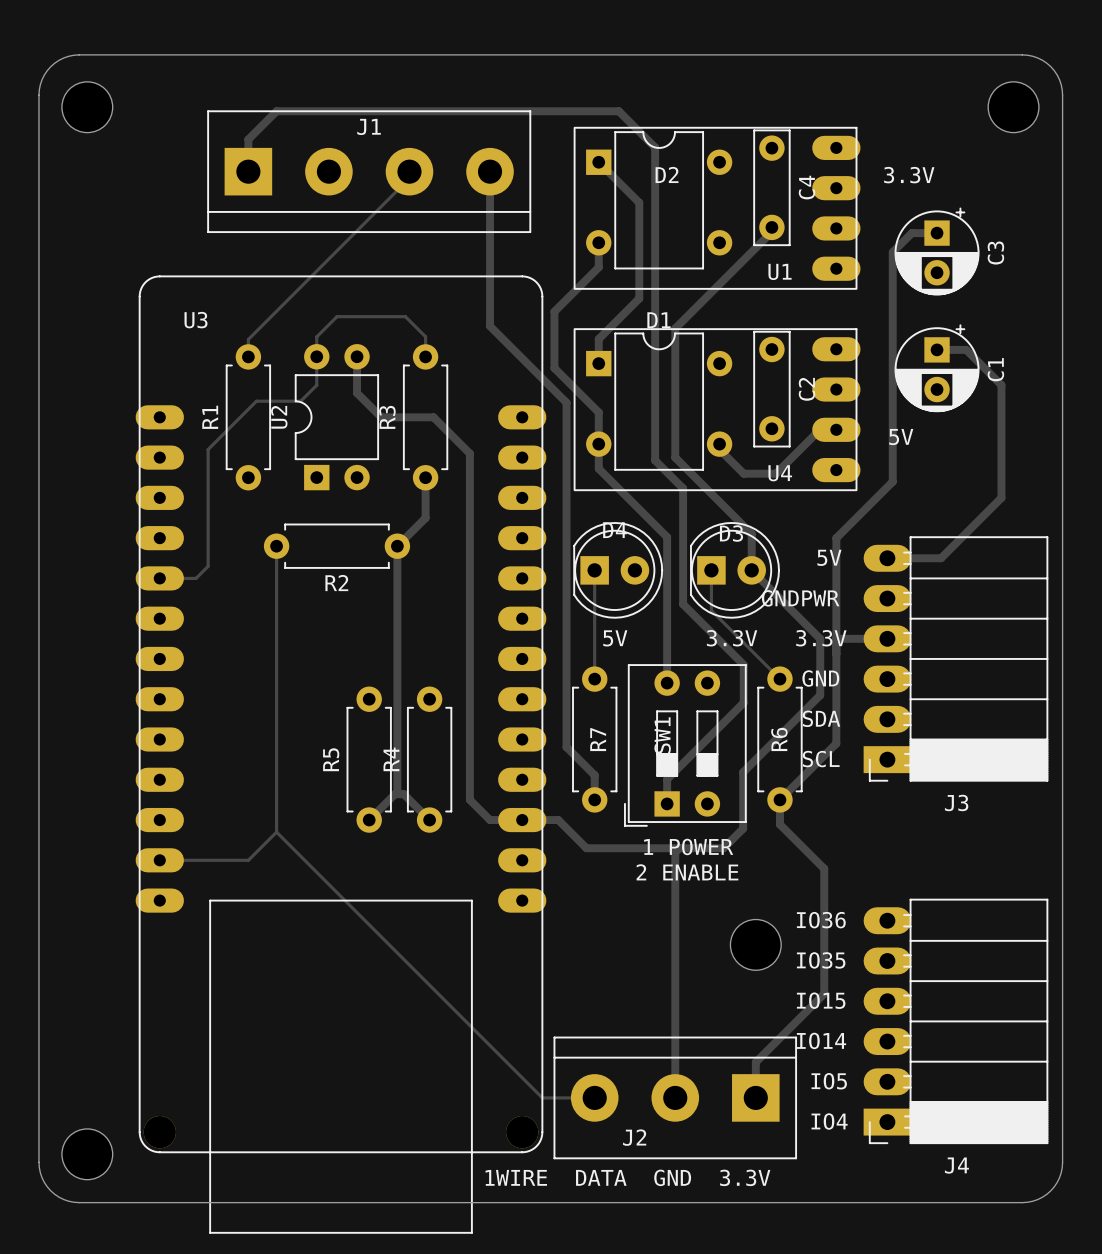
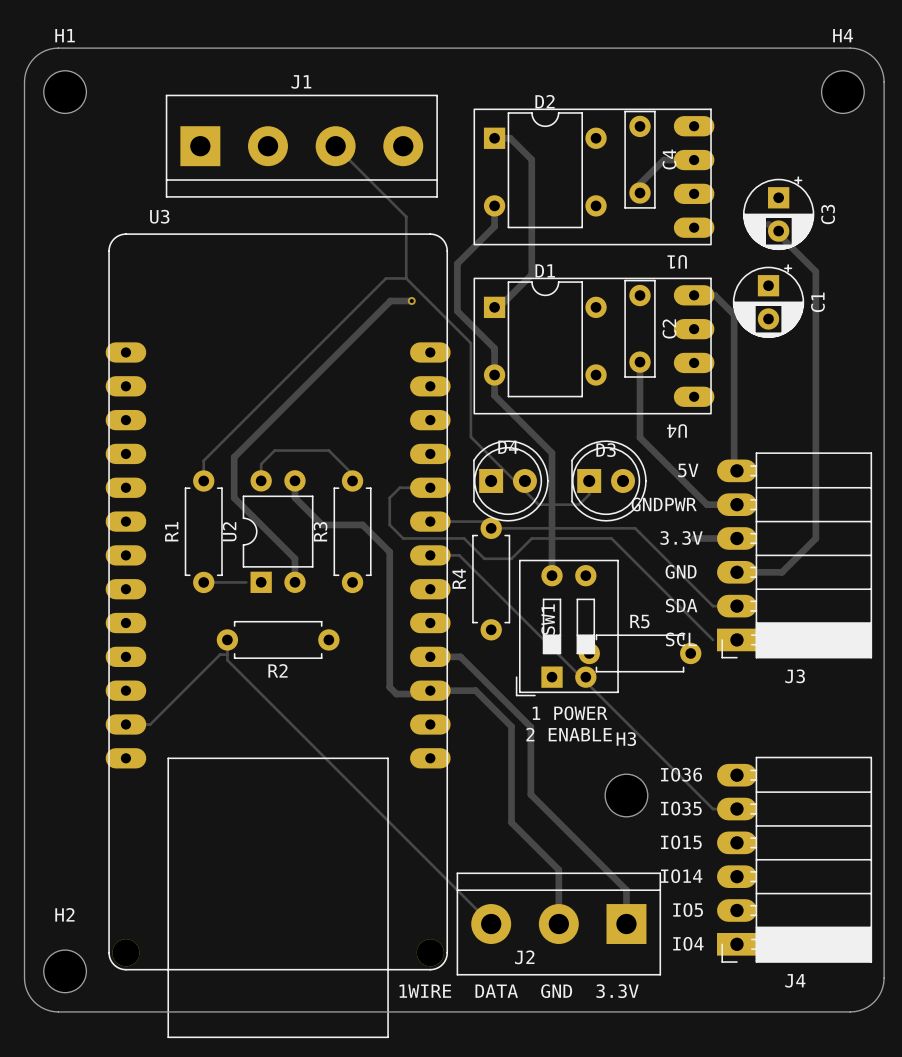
H1 name: none -> H1 (65, 35)
H4 name: none -> H4 (843, 35)
J1 name position: J1 (369, 126) -> J1 (301, 81)
track: (598, 162) (639, 202) (639, 298) (598, 339) (598, 363) -> (494, 138) (510, 138) (531, 159) (531, 274) (499, 307) (494, 307)
track: (248, 171) (248, 139) (276, 111) (618, 111) (655, 147) (655, 460) (683, 488) (683, 604) (743, 664) (743, 702) (667, 779) (667, 803) -> none
track: (409, 171) (409, 178) (248, 339) (248, 356) -> (335, 146) (406, 216) (406, 278)
track: (490, 171) (490, 326) (566, 402) (566, 747) (594, 775) (594, 799) -> none
D2 name position: D2 (667, 174) -> D2 (545, 101)
text: 3.3V (909, 175) -> none
track: (771, 231) (675, 328) (675, 457) (751, 534) (751, 570) (820, 638) (820, 695) (743, 772) (743, 828) (723, 848) (586, 848) (558, 820) -> (640, 196) (640, 183) (663, 160) (694, 160)
track: (937, 233) (911, 233) (892, 252) (892, 481) (836, 538) (836, 743) (779, 799) (779, 824) (824, 868) (824, 993) (755, 1062) -> (430, 656) (460, 656) (530, 727) (530, 794) (626, 890) (626, 894)
track: none -> (768, 224) (815, 271) (815, 538) (782, 572) (736, 572)
U1 name rotation: 0° (780, 271) -> 180° (677, 261)
U1 name position: U1 (780, 271) -> U1 (677, 261)
U3 name position: U3 (196, 320) -> U3 (159, 216)
track: none -> (406, 278) (385, 278) (203, 460) (203, 480)
track: (937, 349) (966, 349) (1001, 385) (1001, 497) (941, 558) (887, 558) -> (694, 295) (714, 295) (734, 314) (734, 468) (736, 470)
track: (357, 356) (357, 393) (381, 417) (433, 417) (469, 453) (469, 799) (490, 820) (522, 820) -> (294, 480) (294, 497) (322, 524) (362, 524) (389, 552) (389, 687) (396, 694) (426, 694) (430, 690)
track: (425, 356) (425, 336) (405, 316) (336, 316) (316, 336) (316, 385) (300, 401) (256, 401) (208, 449) (208, 566) (196, 578) (159, 578) -> none
track: none -> (411, 301) (390, 301) (234, 457) (234, 497) (294, 558) (294, 582)
via: none -> (411, 301)
C1 position: (937, 368) -> (768, 301)
R1 position: (248, 417) -> (203, 531)
U2 position: (336, 417) -> (278, 531)
R3 position: (425, 417) -> (352, 531)
track: (836, 429) (819, 429) (775, 473) (743, 473) (719, 449) (719, 444) -> none
track: none -> (640, 365) (640, 437) (707, 504) (736, 504)
text: 5V (901, 437) -> none
U4 name rotation: 0° (780, 473) -> 180° (676, 430)
U4 name position: U4 (780, 473) -> U4 (676, 430)
track: (425, 477) (425, 518) (397, 546) (397, 794) -> none
track: (276, 546) (276, 832) -> none
R2 position: (336, 546) -> (278, 639)
track: none -> (261, 480) (261, 464) (274, 450) (328, 450) (352, 474) (352, 480)
track: (594, 570) (594, 679) -> none
track: none -> (430, 487) (399, 487) (389, 497) (389, 524) (403, 538) (464, 538) (484, 558) (511, 558) (531, 538) (611, 538) (713, 639)
track: (711, 586) (711, 610) (779, 679) -> (589, 494) (579, 504) (538, 504) (470, 437) (470, 343) (406, 278)
track: none -> (430, 521) (484, 521) (491, 528) (635, 528) (713, 606) (736, 606)
text: 5V (615, 638) -> none
text: 3.3V (732, 638) -> none
track: none -> (430, 555) (459, 555) (713, 809) (736, 809)
track: none -> (203, 582) (246, 582)
R7: (594, 739) -> none
R6: (779, 739) -> none
R5 rotation: 0° (369, 759) -> 90° clockwise (640, 653)
R5 position: (369, 759) -> (640, 653)
R4 position: (429, 759) -> (491, 579)
track: (369, 820) (395, 794) (403, 794) (429, 820) -> none
track: (276, 832) (248, 860) (188, 860) -> (227, 654) (220, 654) (150, 724)
track: (276, 832) (542, 1097) (594, 1097) -> (227, 639) (227, 660) (491, 924)
track: (679, 848) (675, 852) (675, 1033) -> (460, 690) (475, 690) (511, 726) (511, 822) (558, 869)
H3 name: none -> H3 (626, 739)
H2 name: none -> H2 (64, 914)

